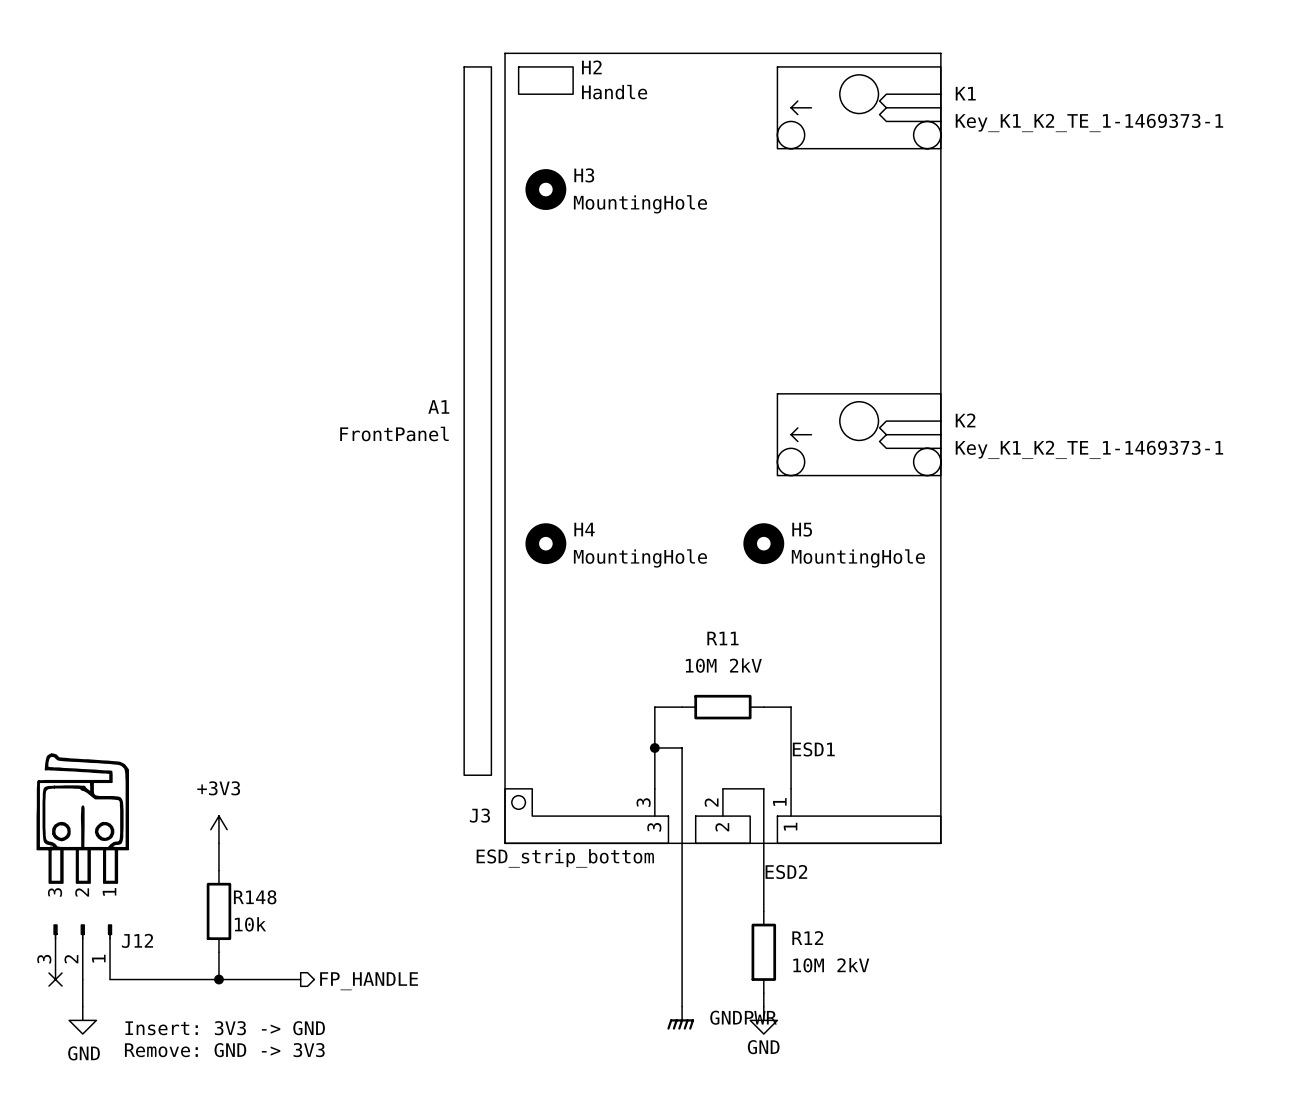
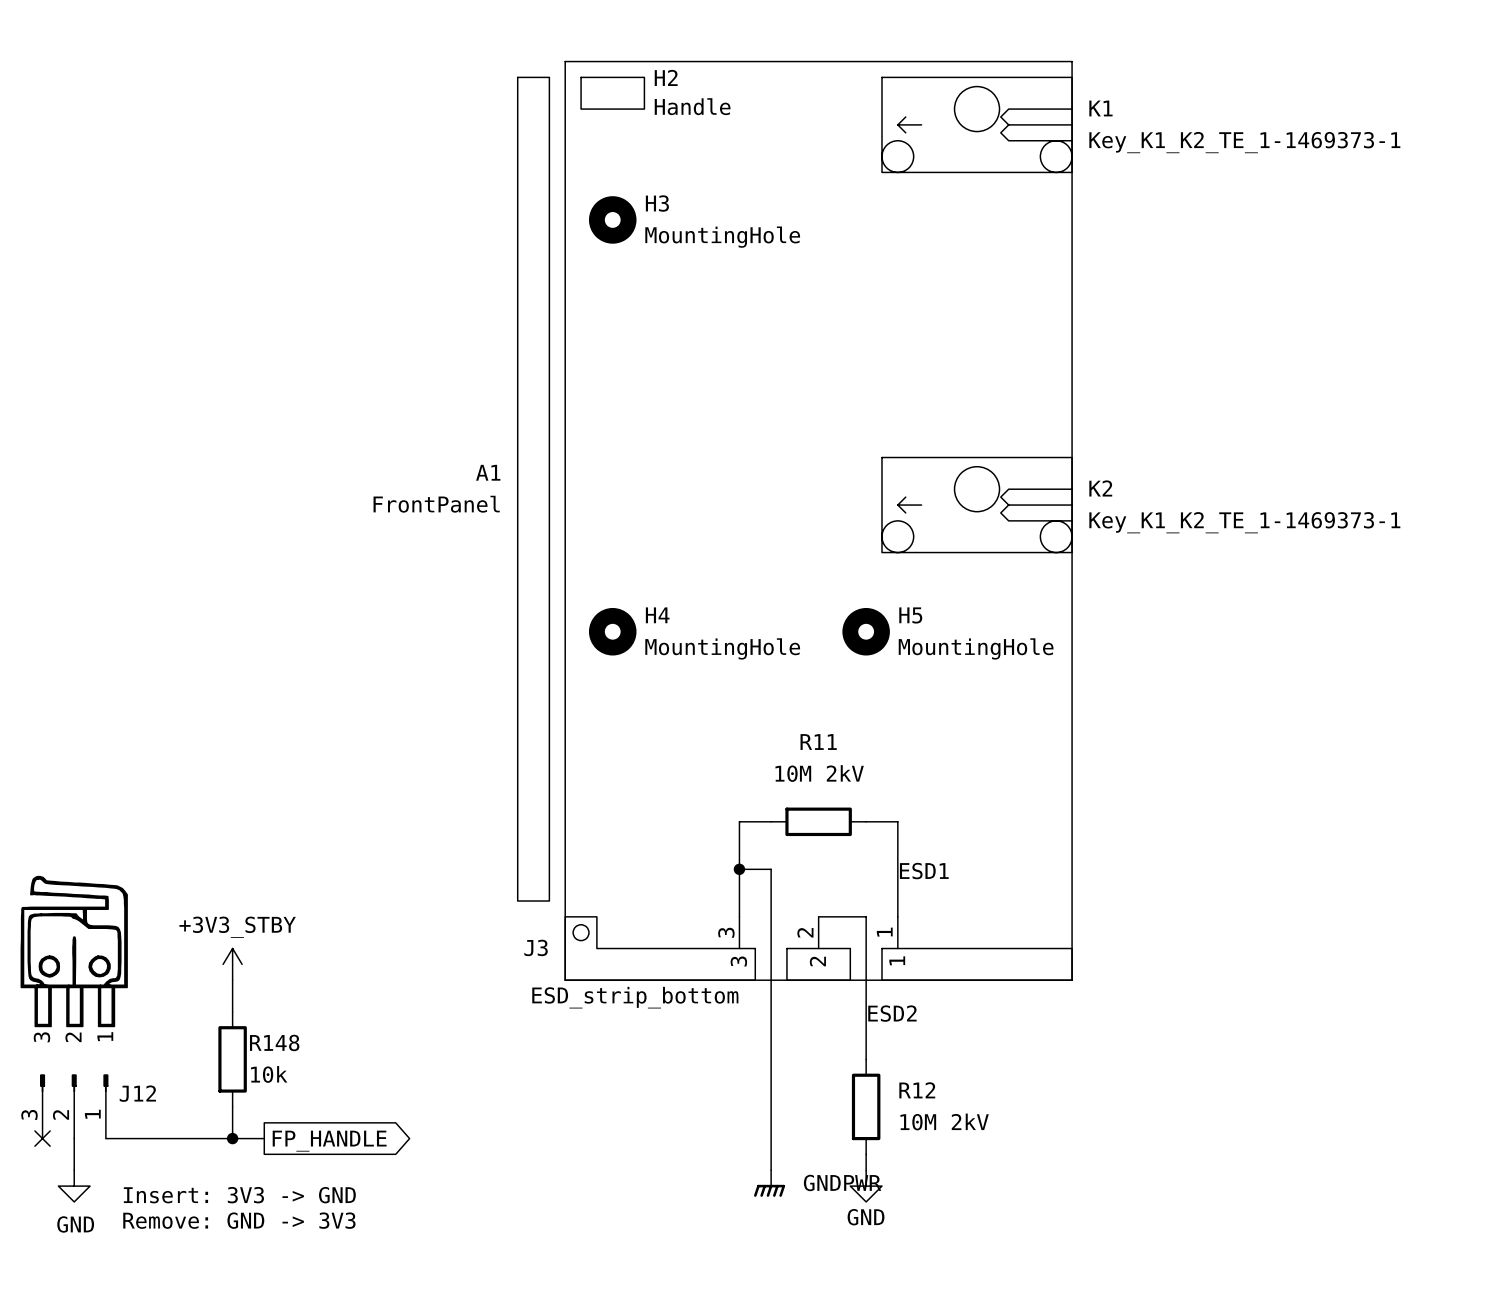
power symbol: +3V3 (218, 829) -> +3V3_STBY (232, 964)
wire: (246, 979) (300, 979) -> none
global label: none -> FP_HANDLE (329, 1141)
hierarchical label: FP_HANDLE (369, 981) -> none

